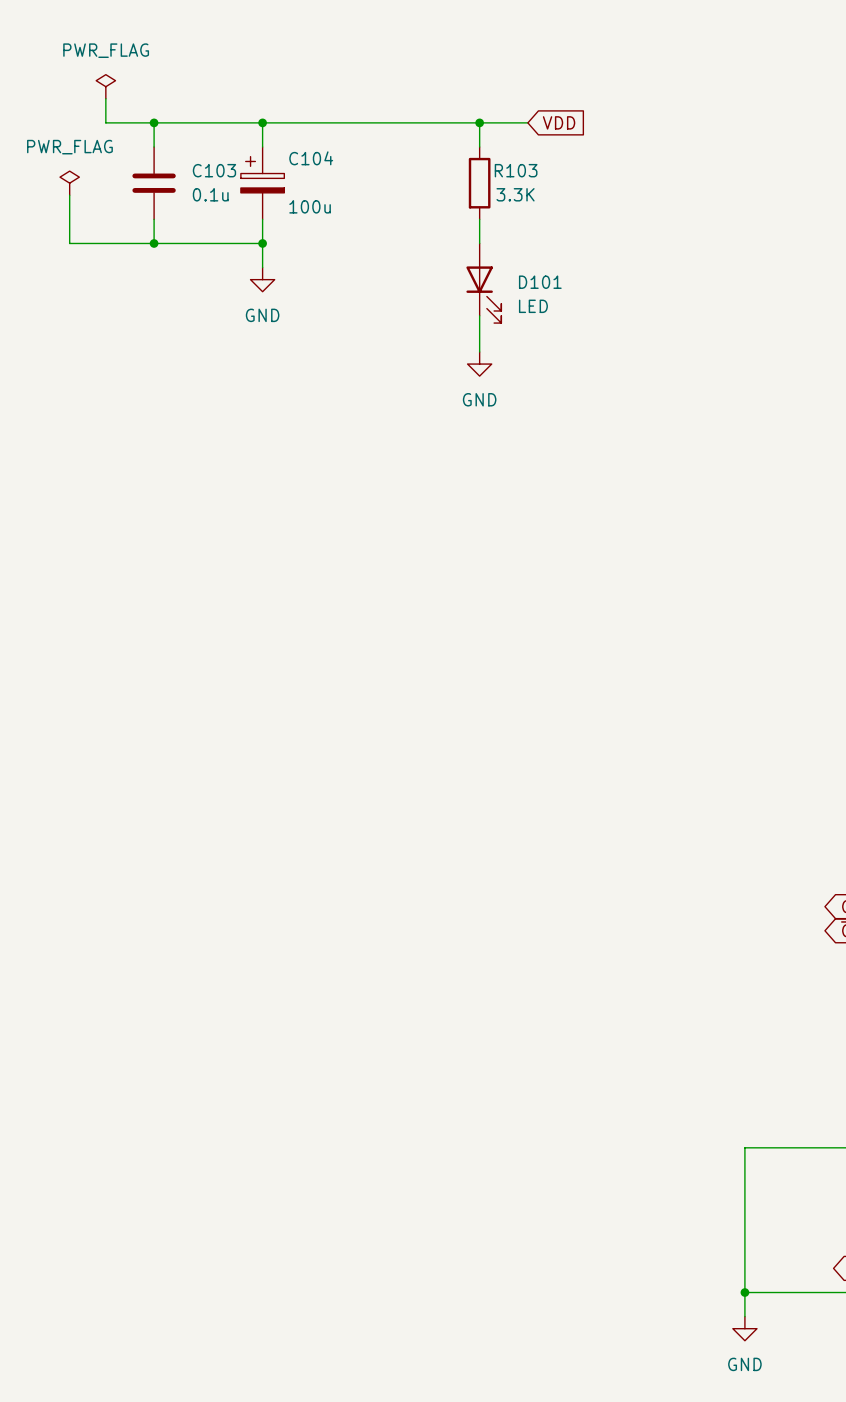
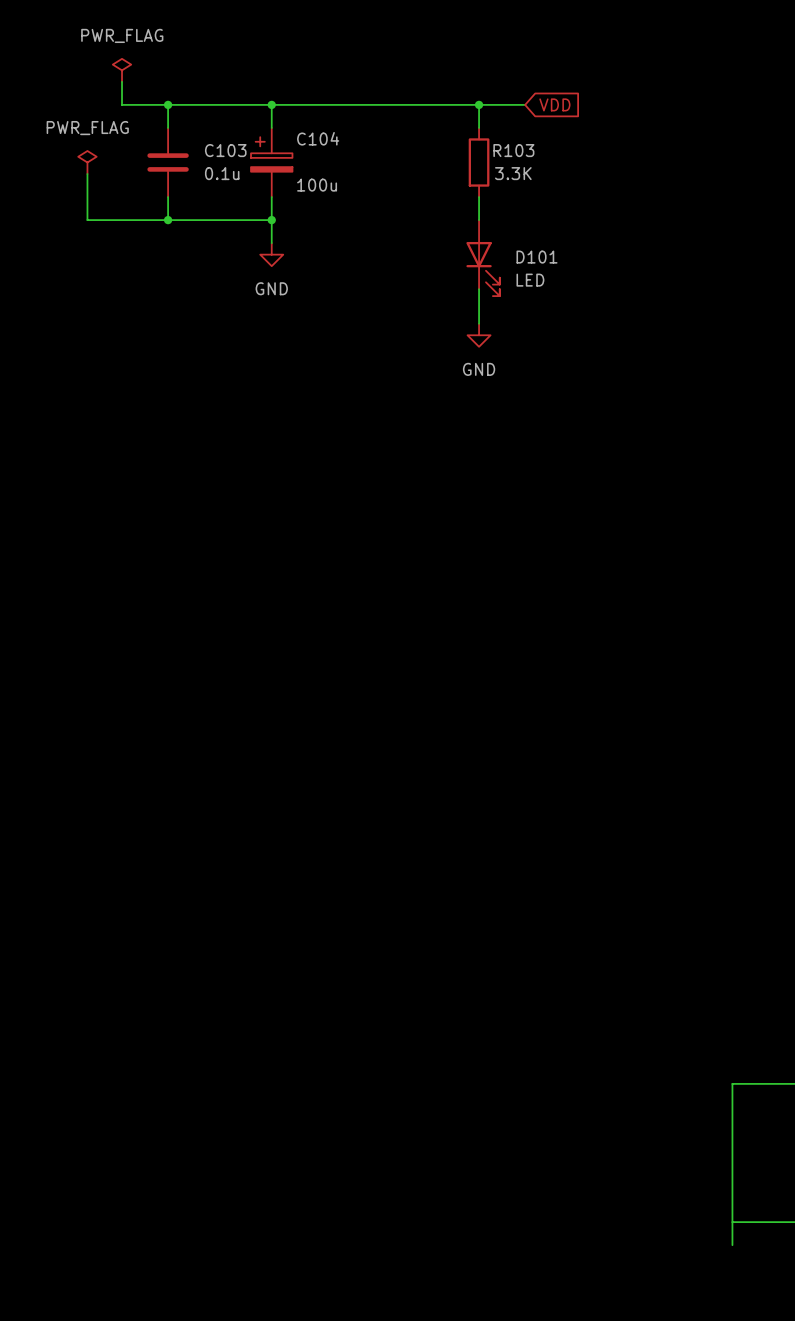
junction: (744, 1292) -> none
power symbol: GND (744, 1328) -> none

